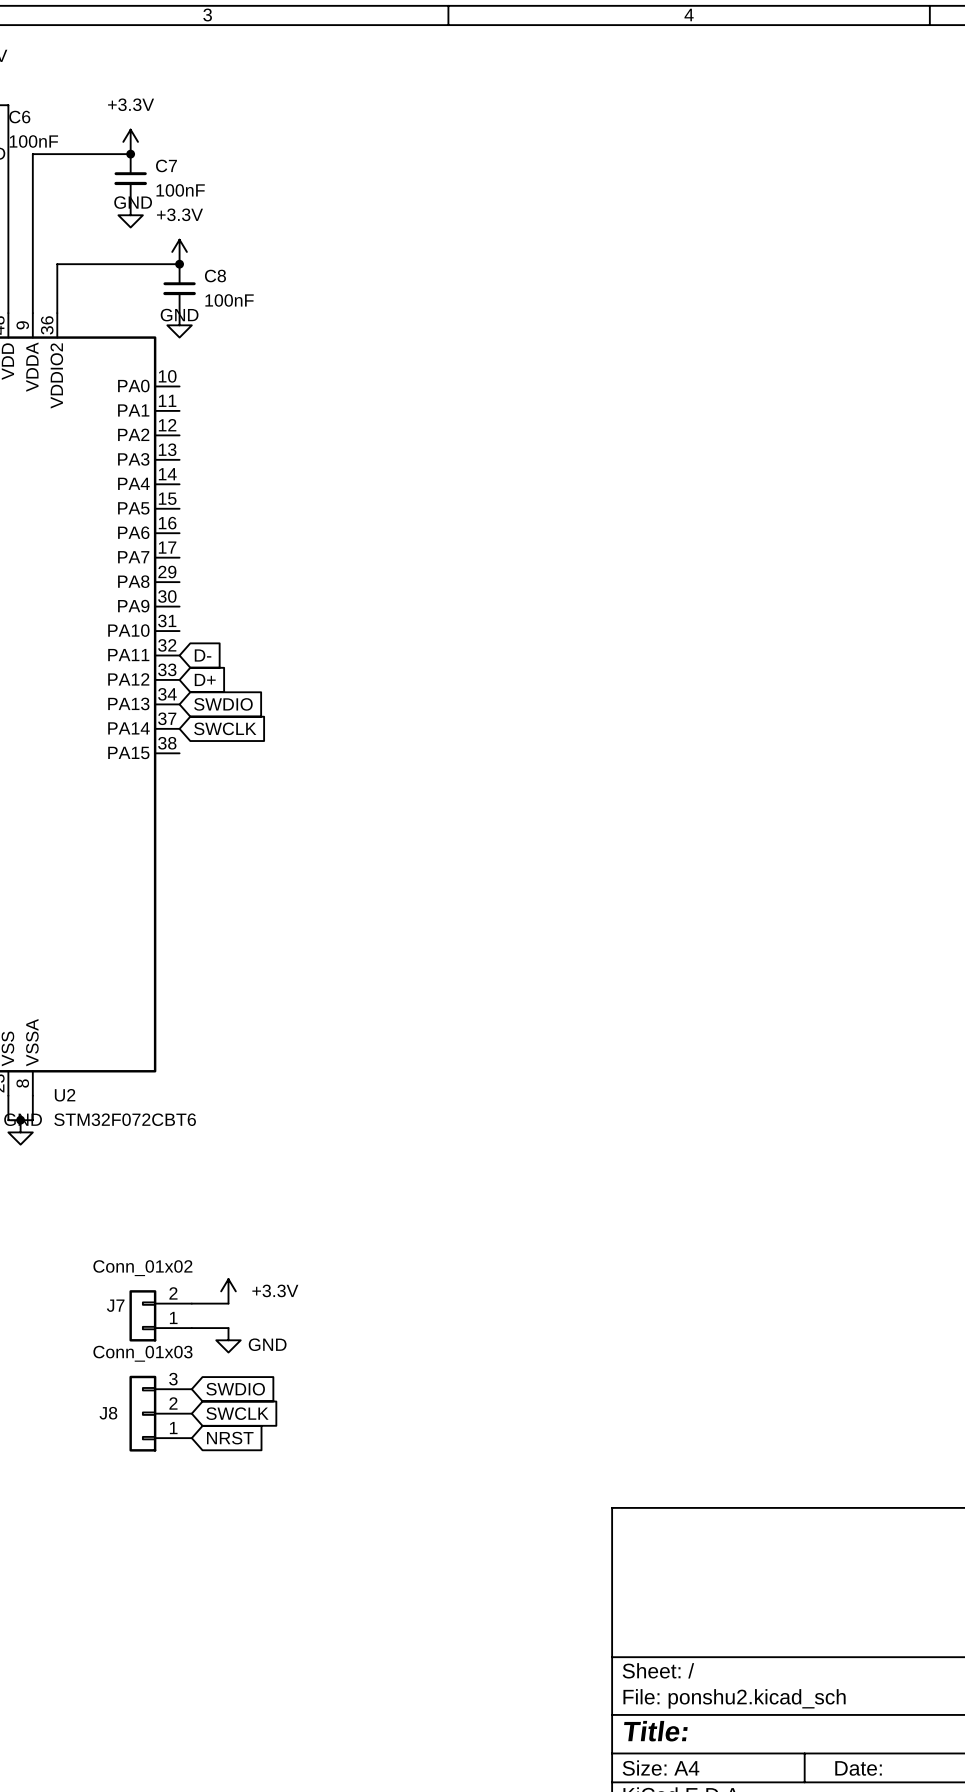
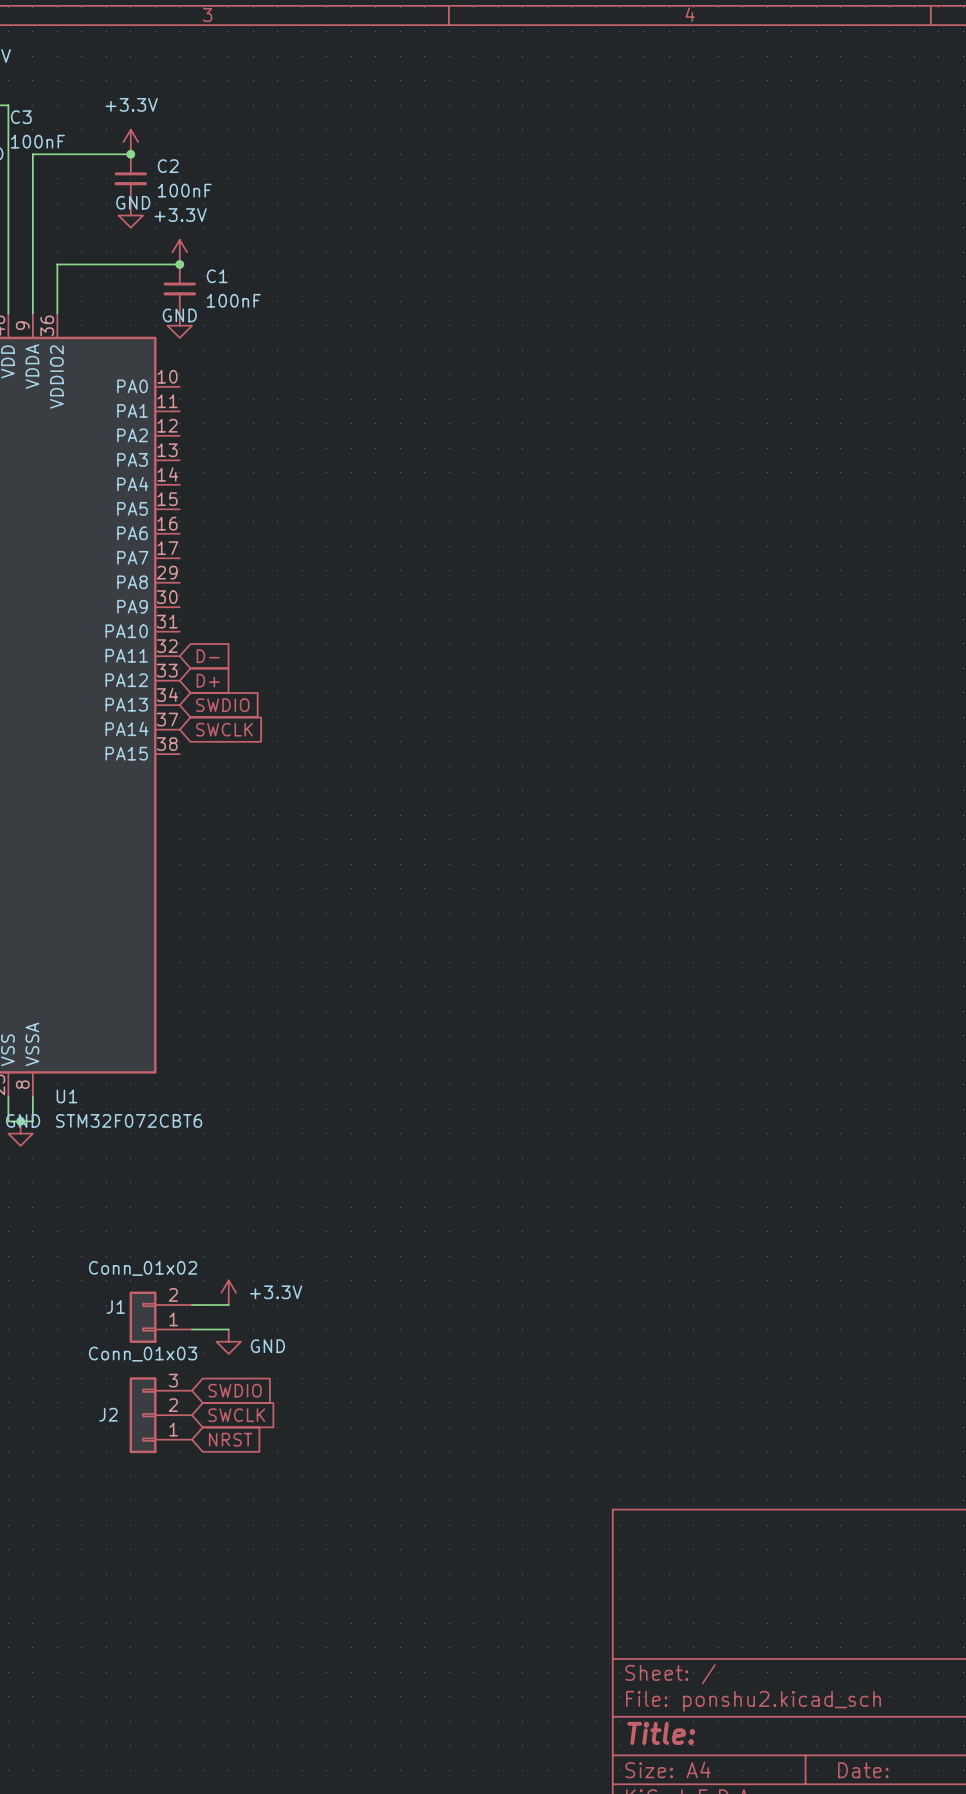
C6 name: C6 (19, 117) -> C3 (21, 117)
C7 name: C7 (166, 165) -> C2 (168, 166)
C8 name: C8 (215, 276) -> C1 (217, 276)
U2 name: U2 (65, 1095) -> U1 (67, 1096)
J7 name: J7 (115, 1305) -> J1 (115, 1307)
J8 name: J8 (108, 1413) -> J2 (108, 1414)

